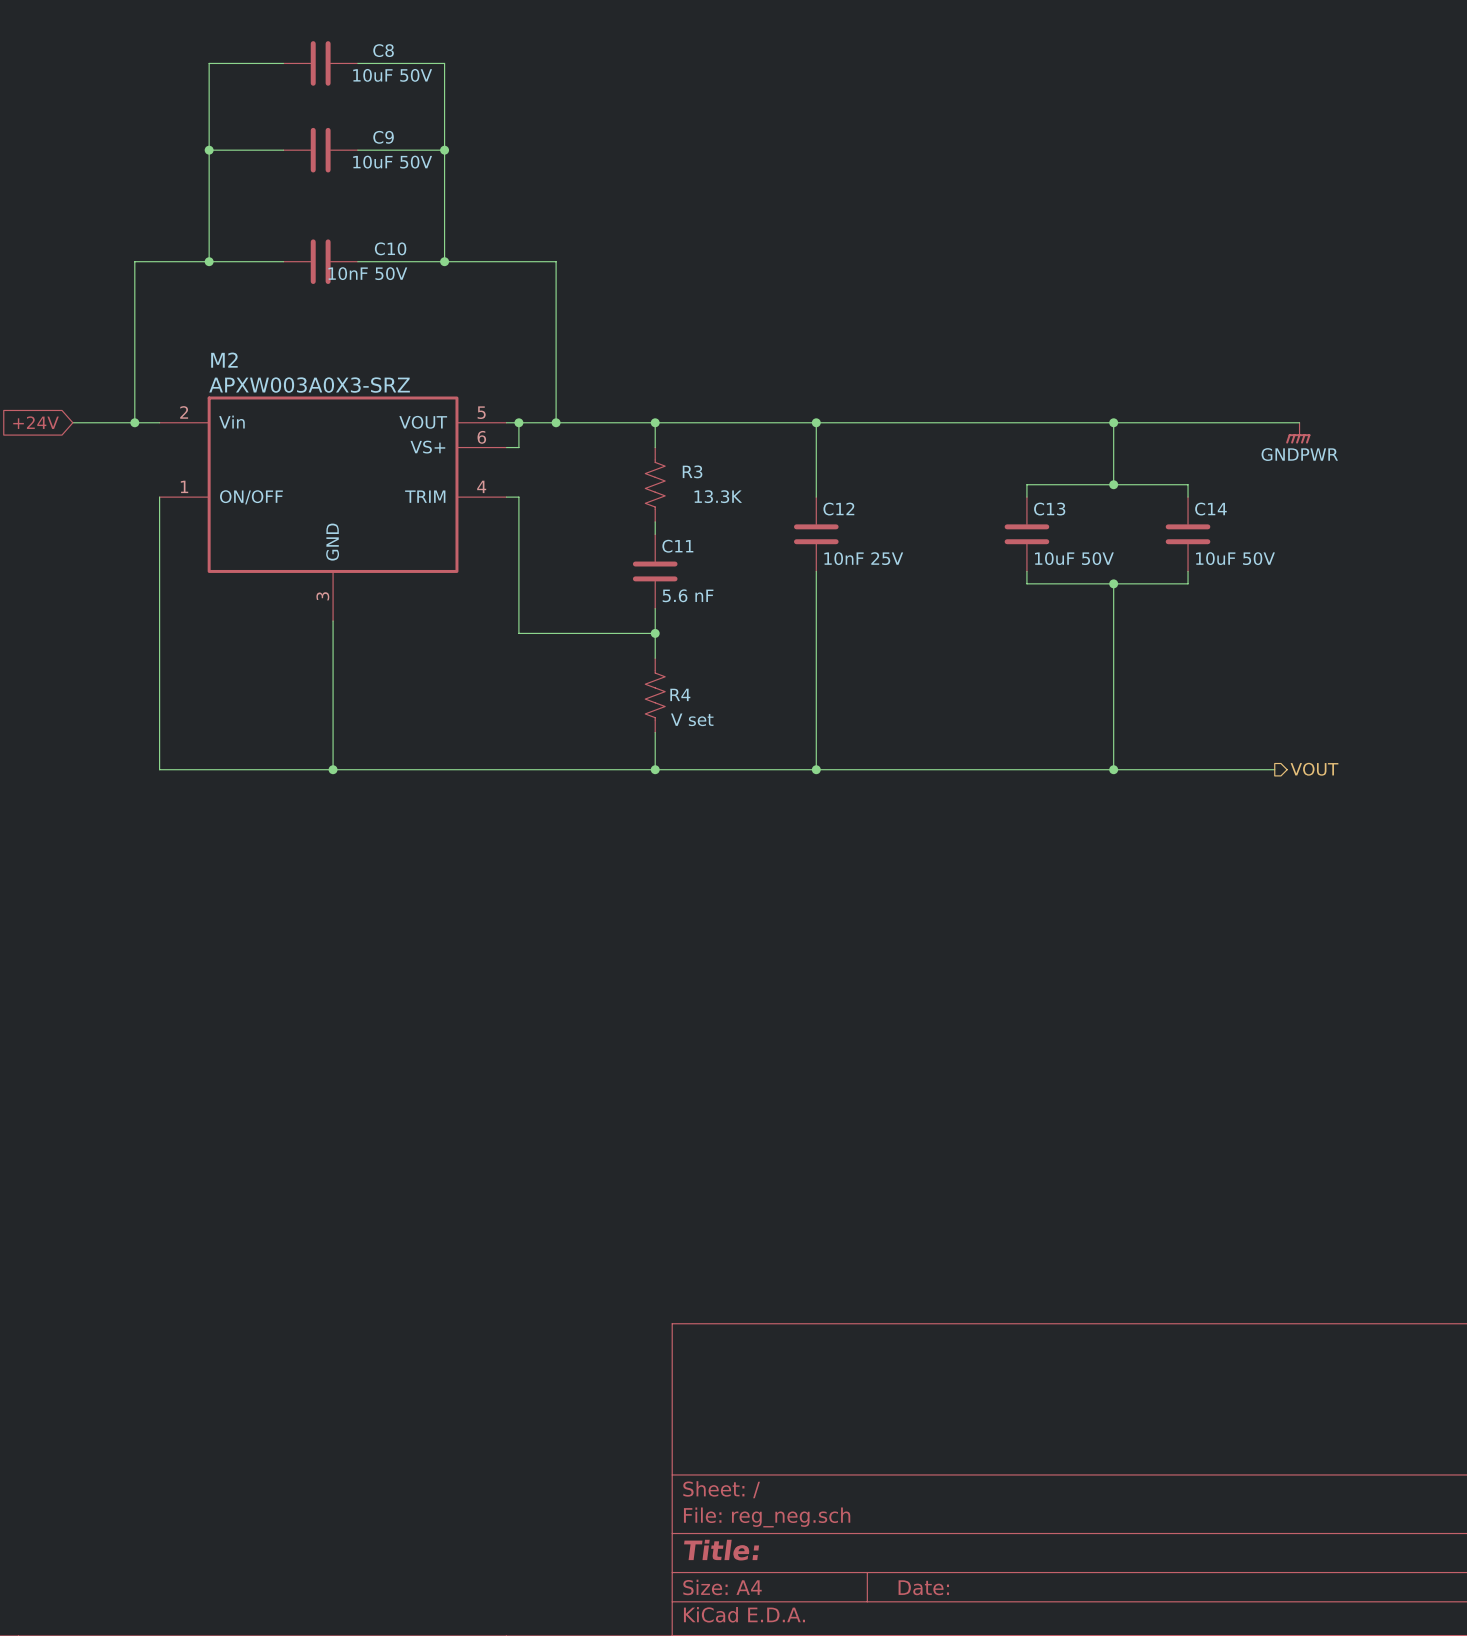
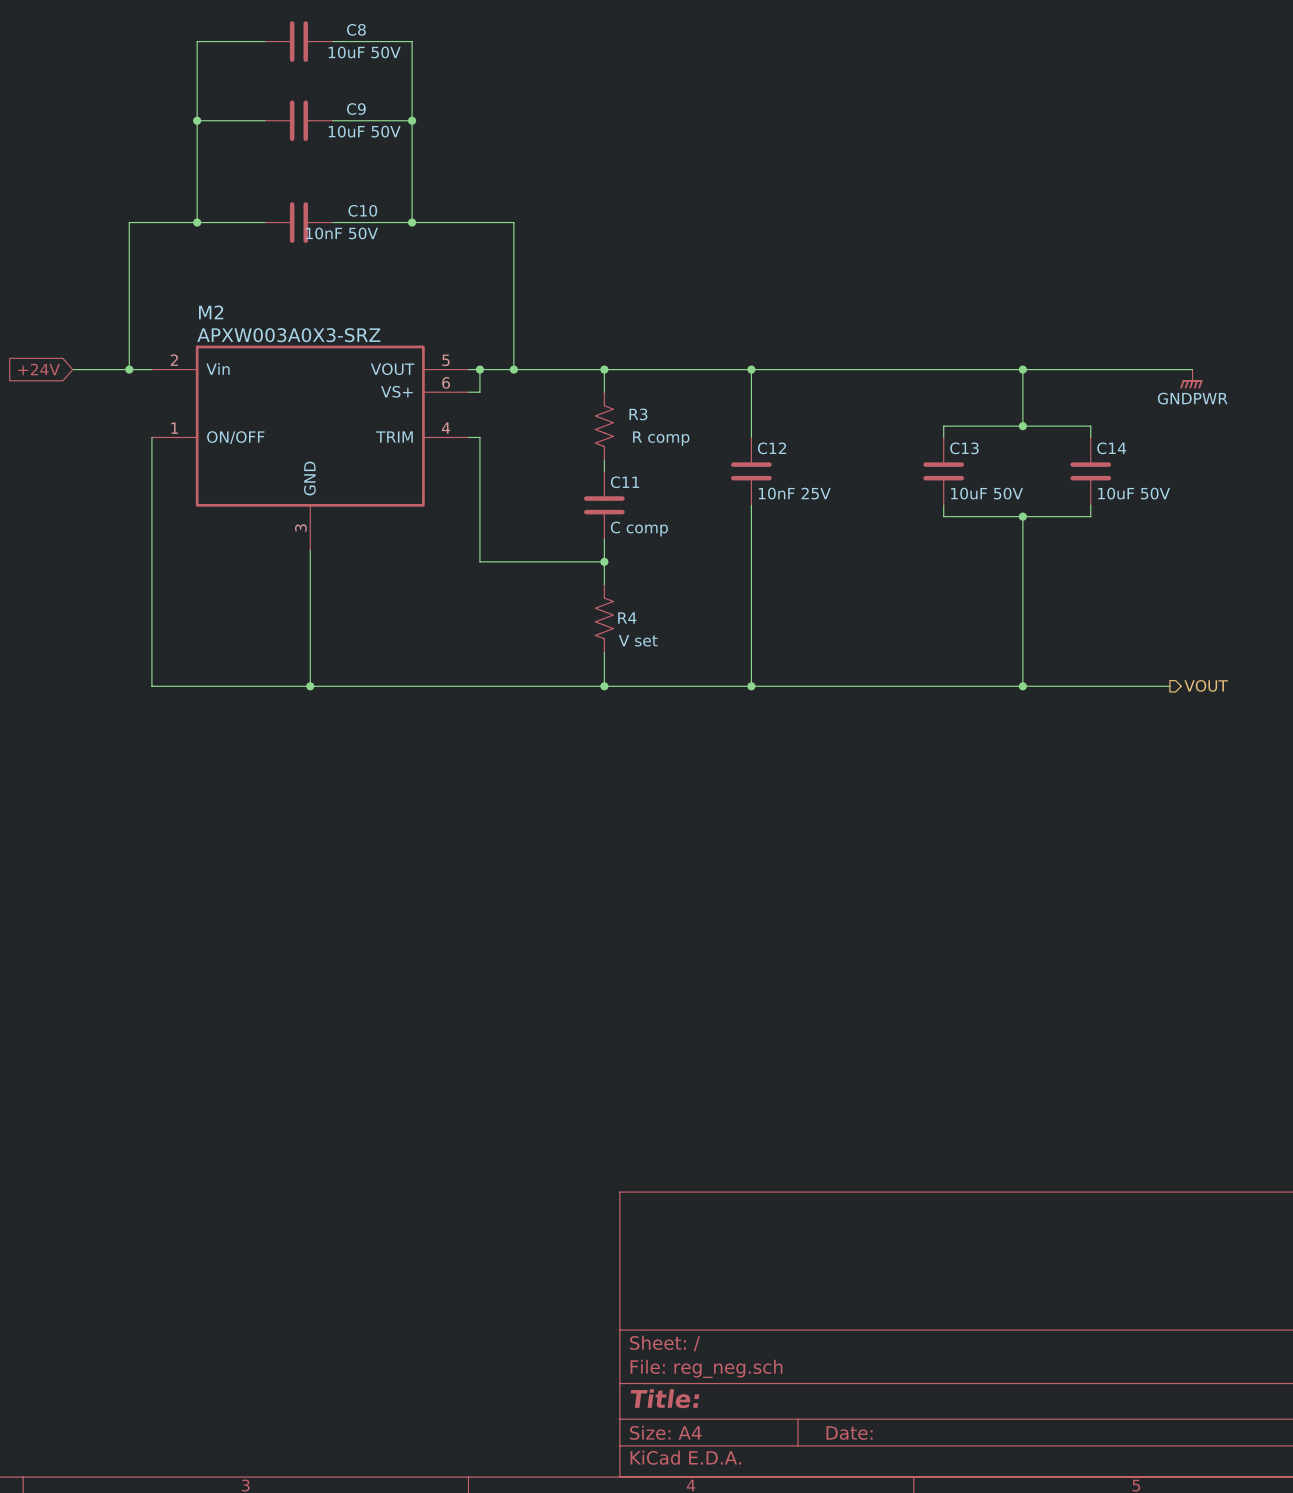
R3 value: 13.3K (718, 496) -> R comp (661, 438)
C11 value: 5.6 nF (688, 595) -> C comp (639, 529)

